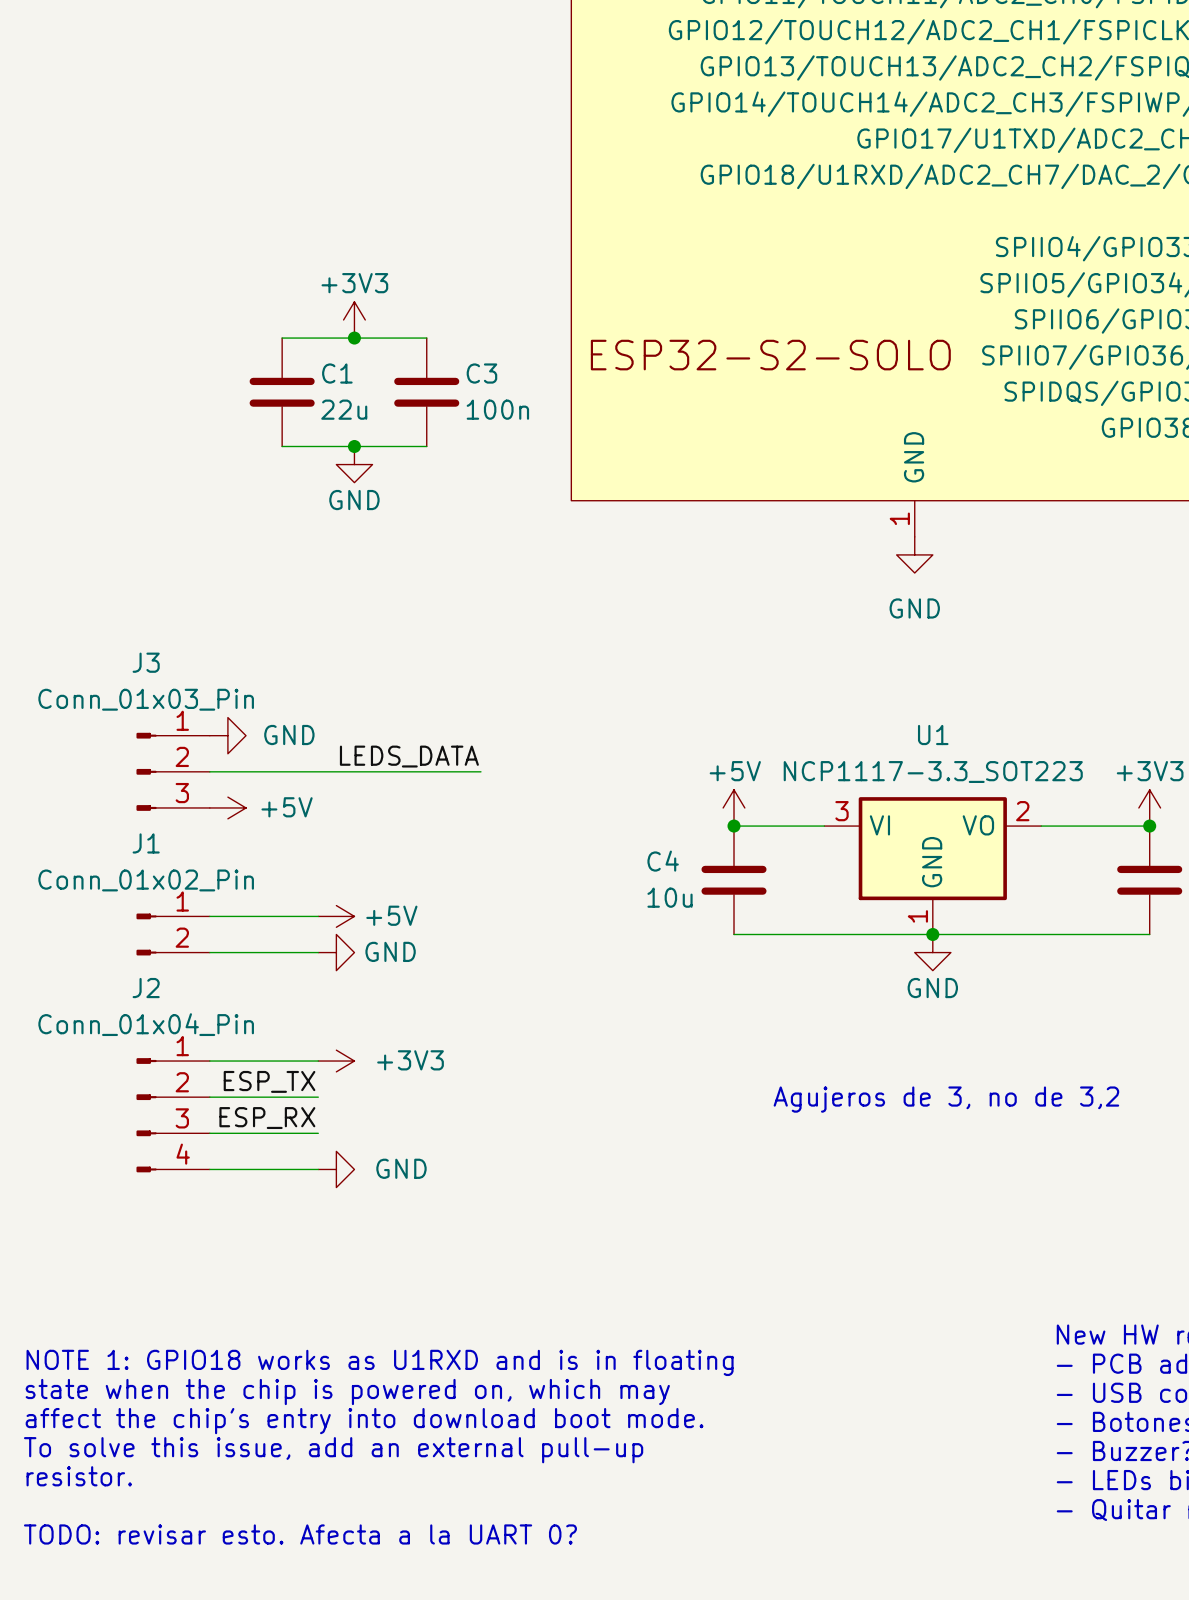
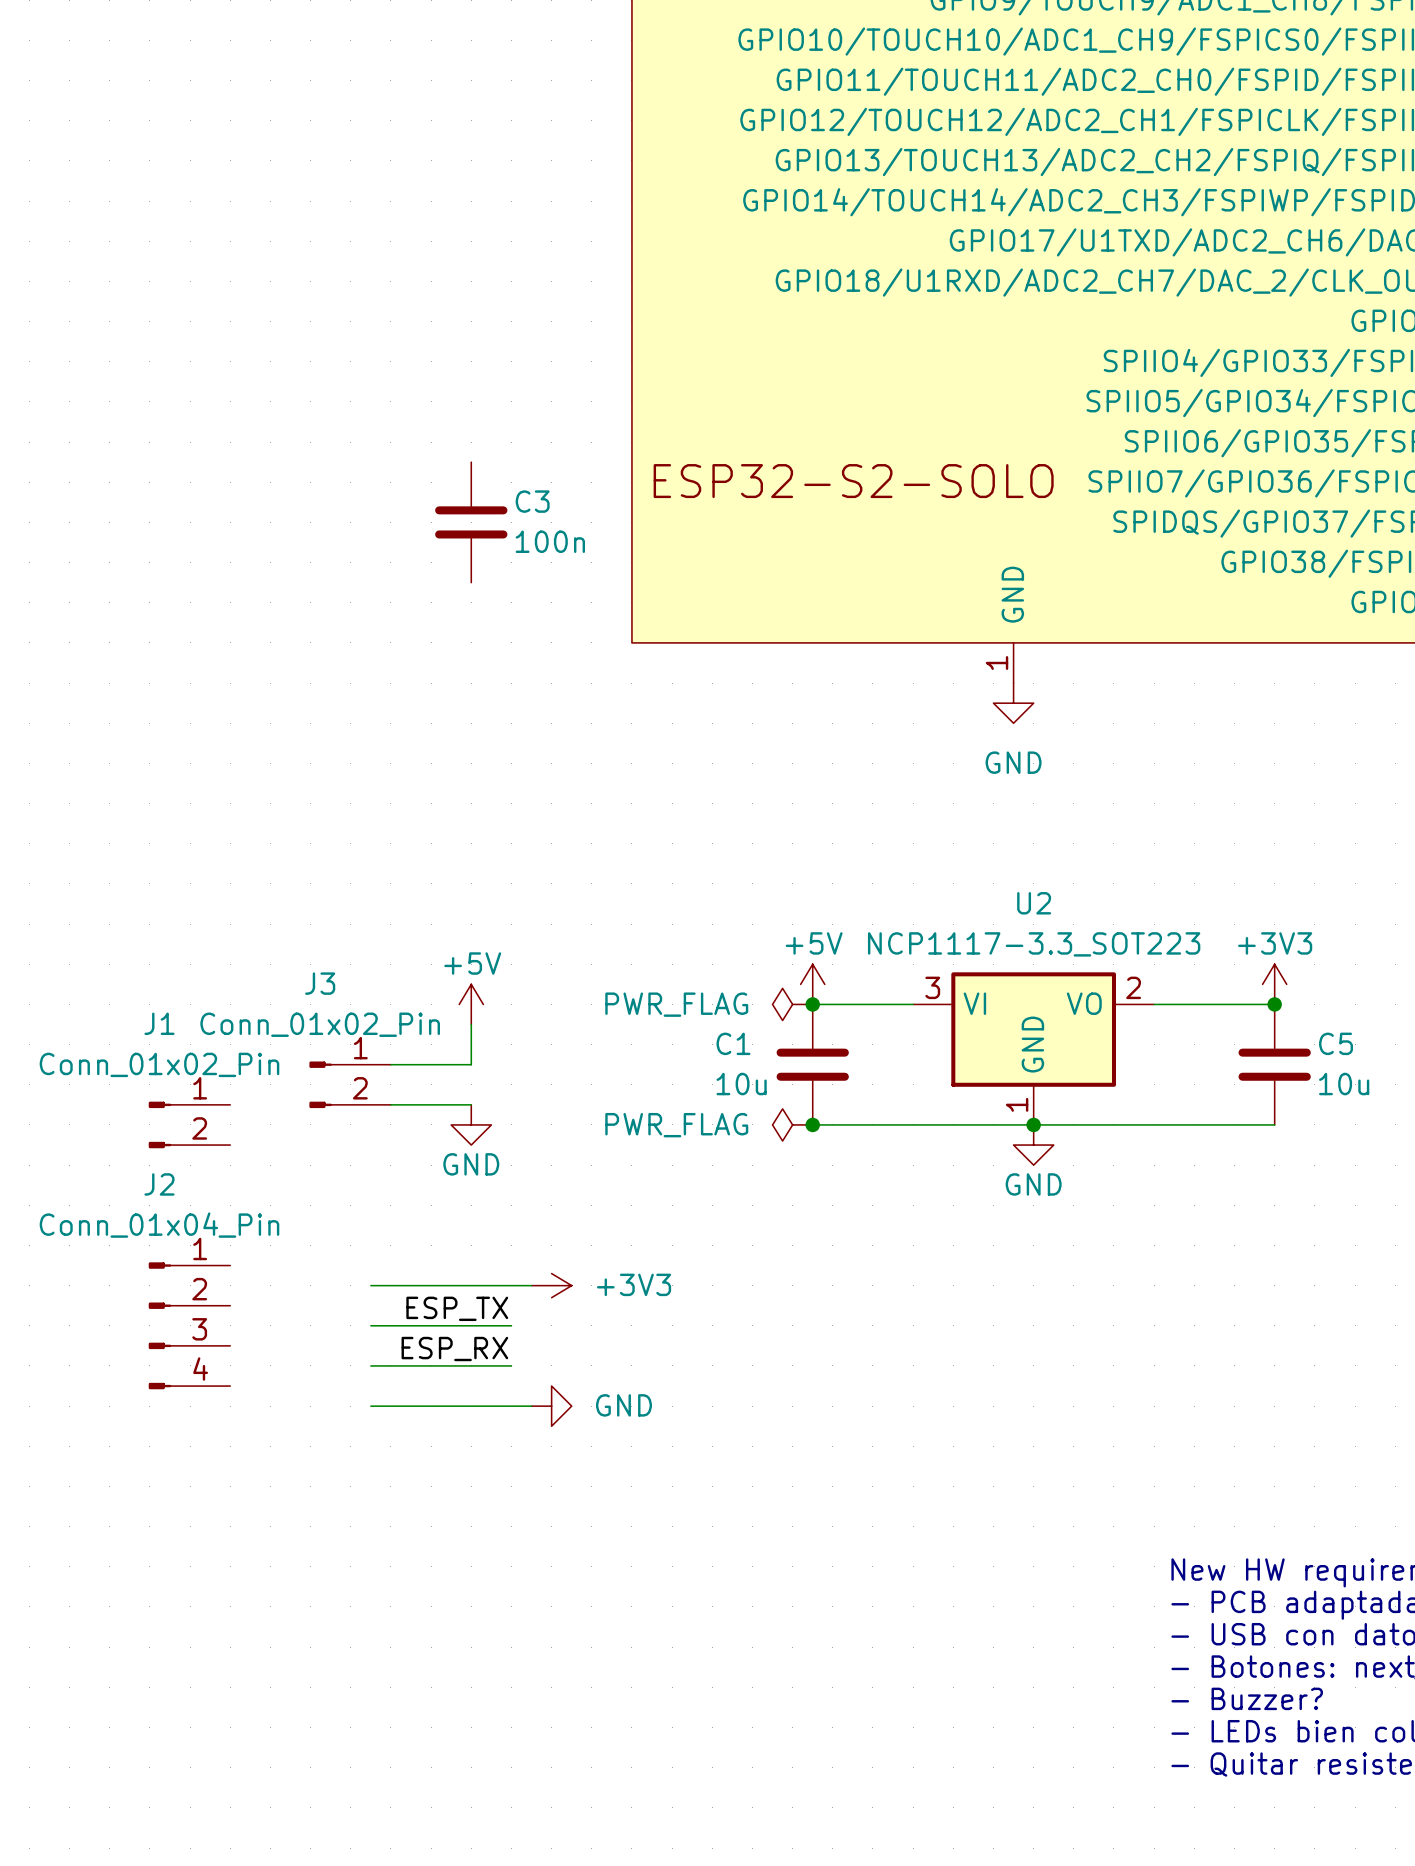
power symbol: +3V3 (354, 319) -> none
wire: (282, 338) (426, 338) -> none
junction: (354, 338) -> none
C1: 22u (282, 392) -> none
wire: (282, 446) (426, 446) -> none
junction: (354, 446) -> none
power symbol: GND (354, 464) -> none
J3 value: Conn_01x03_Pin (146, 699) -> Conn_01x02_Pin (320, 1024)
J3 symbol: [136, 732, 210, 811] -> [309, 1061, 391, 1109]
power symbol: GND (227, 735) -> none
U1 name: U1 (933, 735) -> U2 (1034, 903)
label: LEDS_DATA (409, 756) -> none
wire: (209, 771) (480, 771) -> none
power symbol: +5V (227, 807) -> none
power symbol: none -> +5V (471, 1004)
power symbol: none -> PWR_FLAG (792, 1004)
wire: none -> (471, 1024) (471, 1064) (390, 1064)
C4 name: C4 (663, 861) -> C1 (733, 1043)
wire: (209, 916) (318, 916) -> none
power symbol: +5V (336, 916) -> none
wire: none -> (390, 1104) (471, 1104)
power symbol: none -> PWR_FLAG (792, 1124)
junction: none -> (812, 1124)
wire: (209, 952) (318, 952) -> none
power symbol rotation: 0° (336, 952) -> 90° clockwise (471, 1124)
power symbol position: GND (336, 952) -> GND (471, 1124)
wire: (209, 1061) (318, 1061) -> none
power symbol position: +3V3 (336, 1061) -> +3V3 (551, 1285)
wire: none -> (370, 1285) (531, 1285)
label position: ESP_TX (269, 1081) -> ESP_TX (457, 1308)
wire: (209, 1097) (318, 1097) -> none
text: Agujeros de 3, no de 3,2 (946, 1099) -> none
wire: none -> (370, 1325) (511, 1325)
label position: ESP_RX (267, 1118) -> ESP_RX (454, 1349)
wire: (209, 1133) (318, 1133) -> none
wire: none -> (370, 1365) (511, 1365)
wire: (209, 1169) (318, 1169) -> none
power symbol: GND (336, 1169) -> none
wire: none -> (370, 1406) (531, 1406)
power symbol: none -> GND (551, 1406)
text: NOTE 1: GPIO18 works as U1RXD and is in floating (380, 1362) -> none
text: state when the chip is powered on, which may (347, 1391) -> none
text: affect the chip's entry into download boot mode. (364, 1421) -> none
text: To solve this issue, add an external pull-up (333, 1450) -> none
text: resistor. (79, 1476) -> none
text: TODO: revisar esto. Afecta a la UART 0? (300, 1534) -> none

